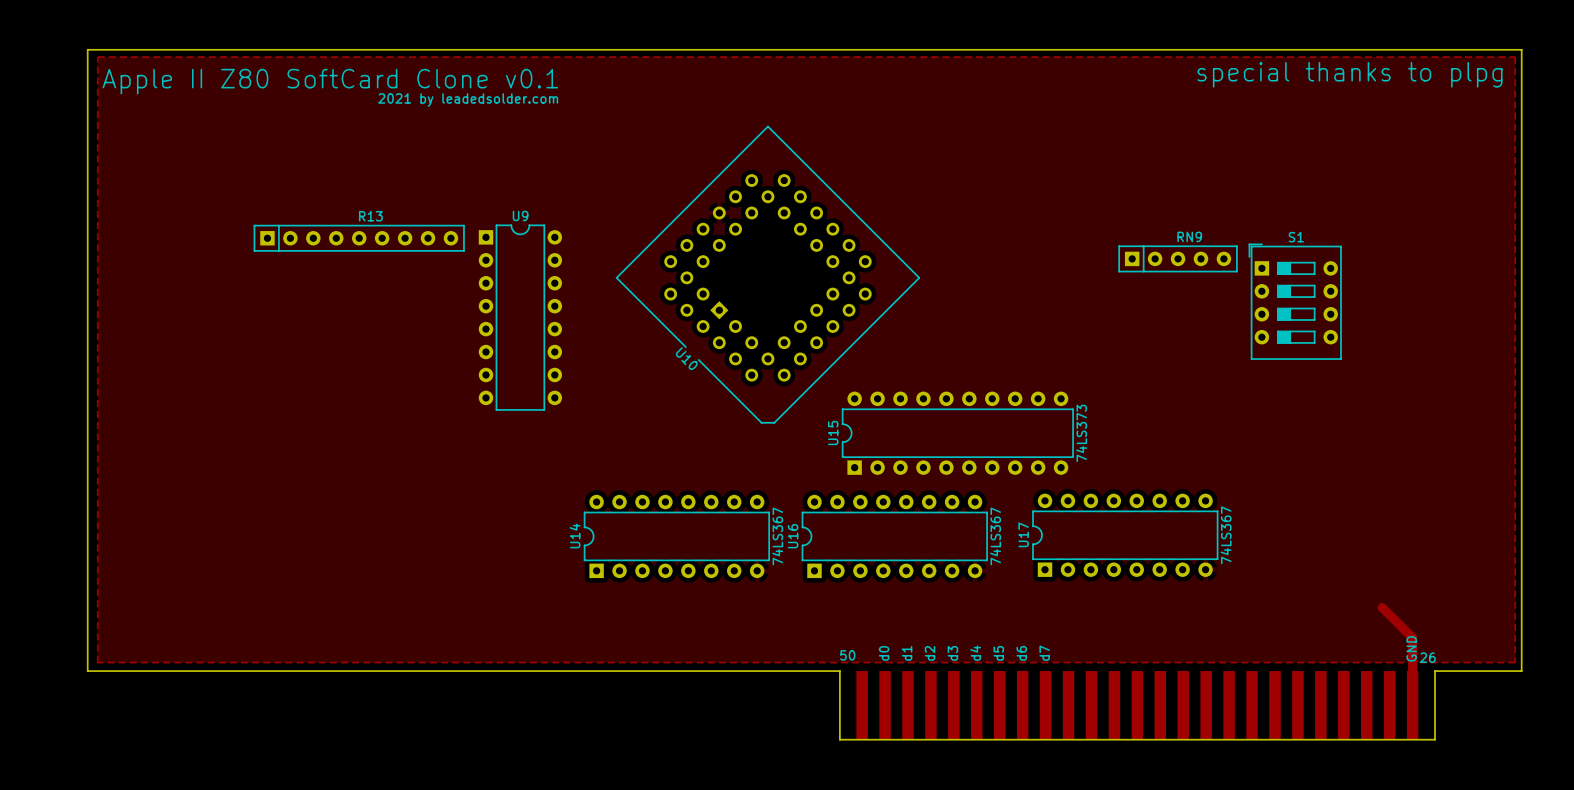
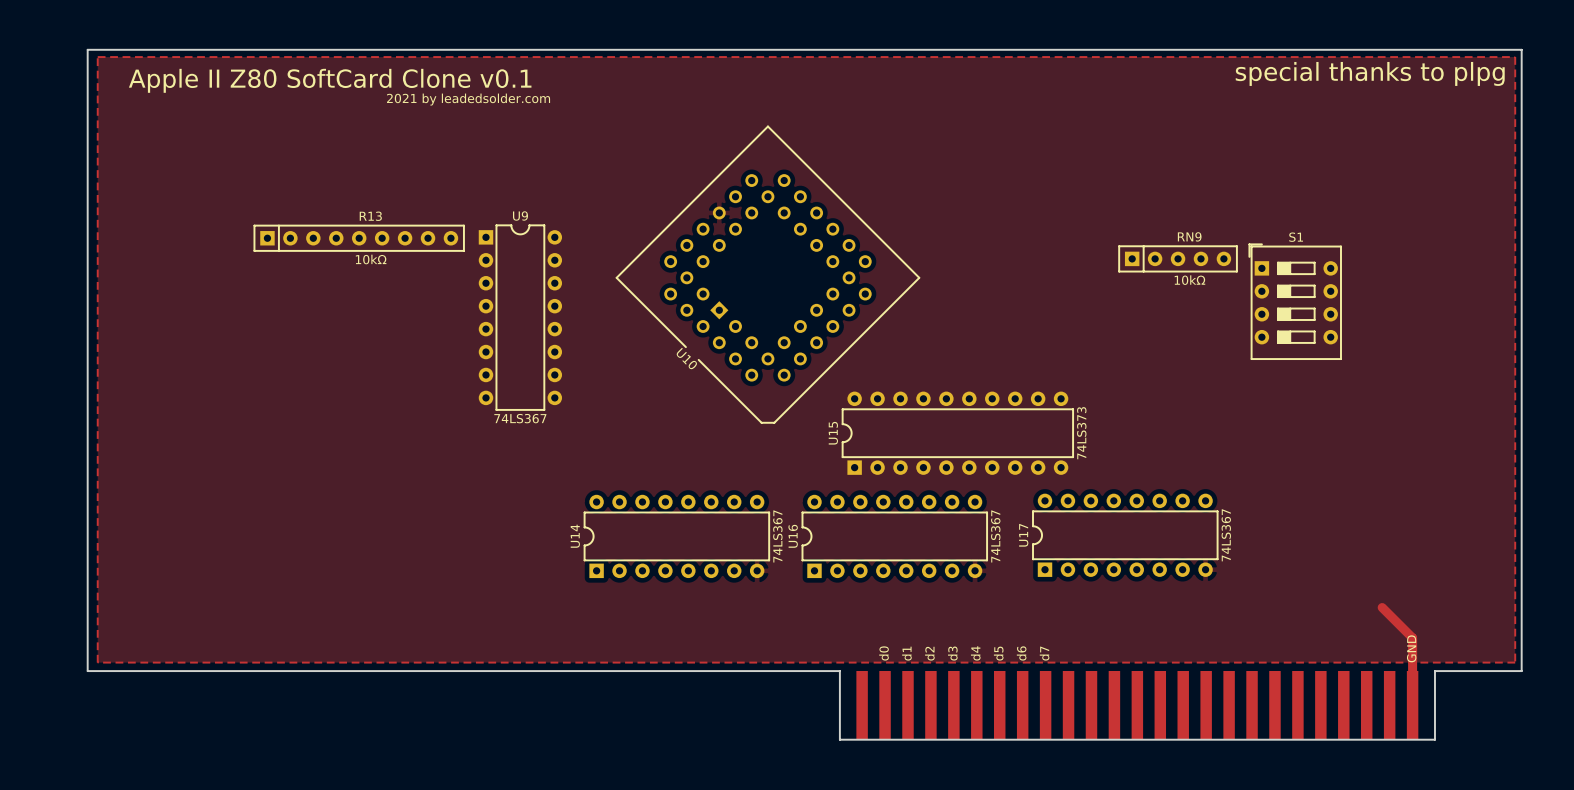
R13 value: none -> 10kΩ (371, 259)
RN9 value: none -> 10kΩ (1189, 280)
U9 value: none -> 74LS367 (520, 418)
text: 50 (847, 655) -> none
text: 26 (1427, 657) -> none

